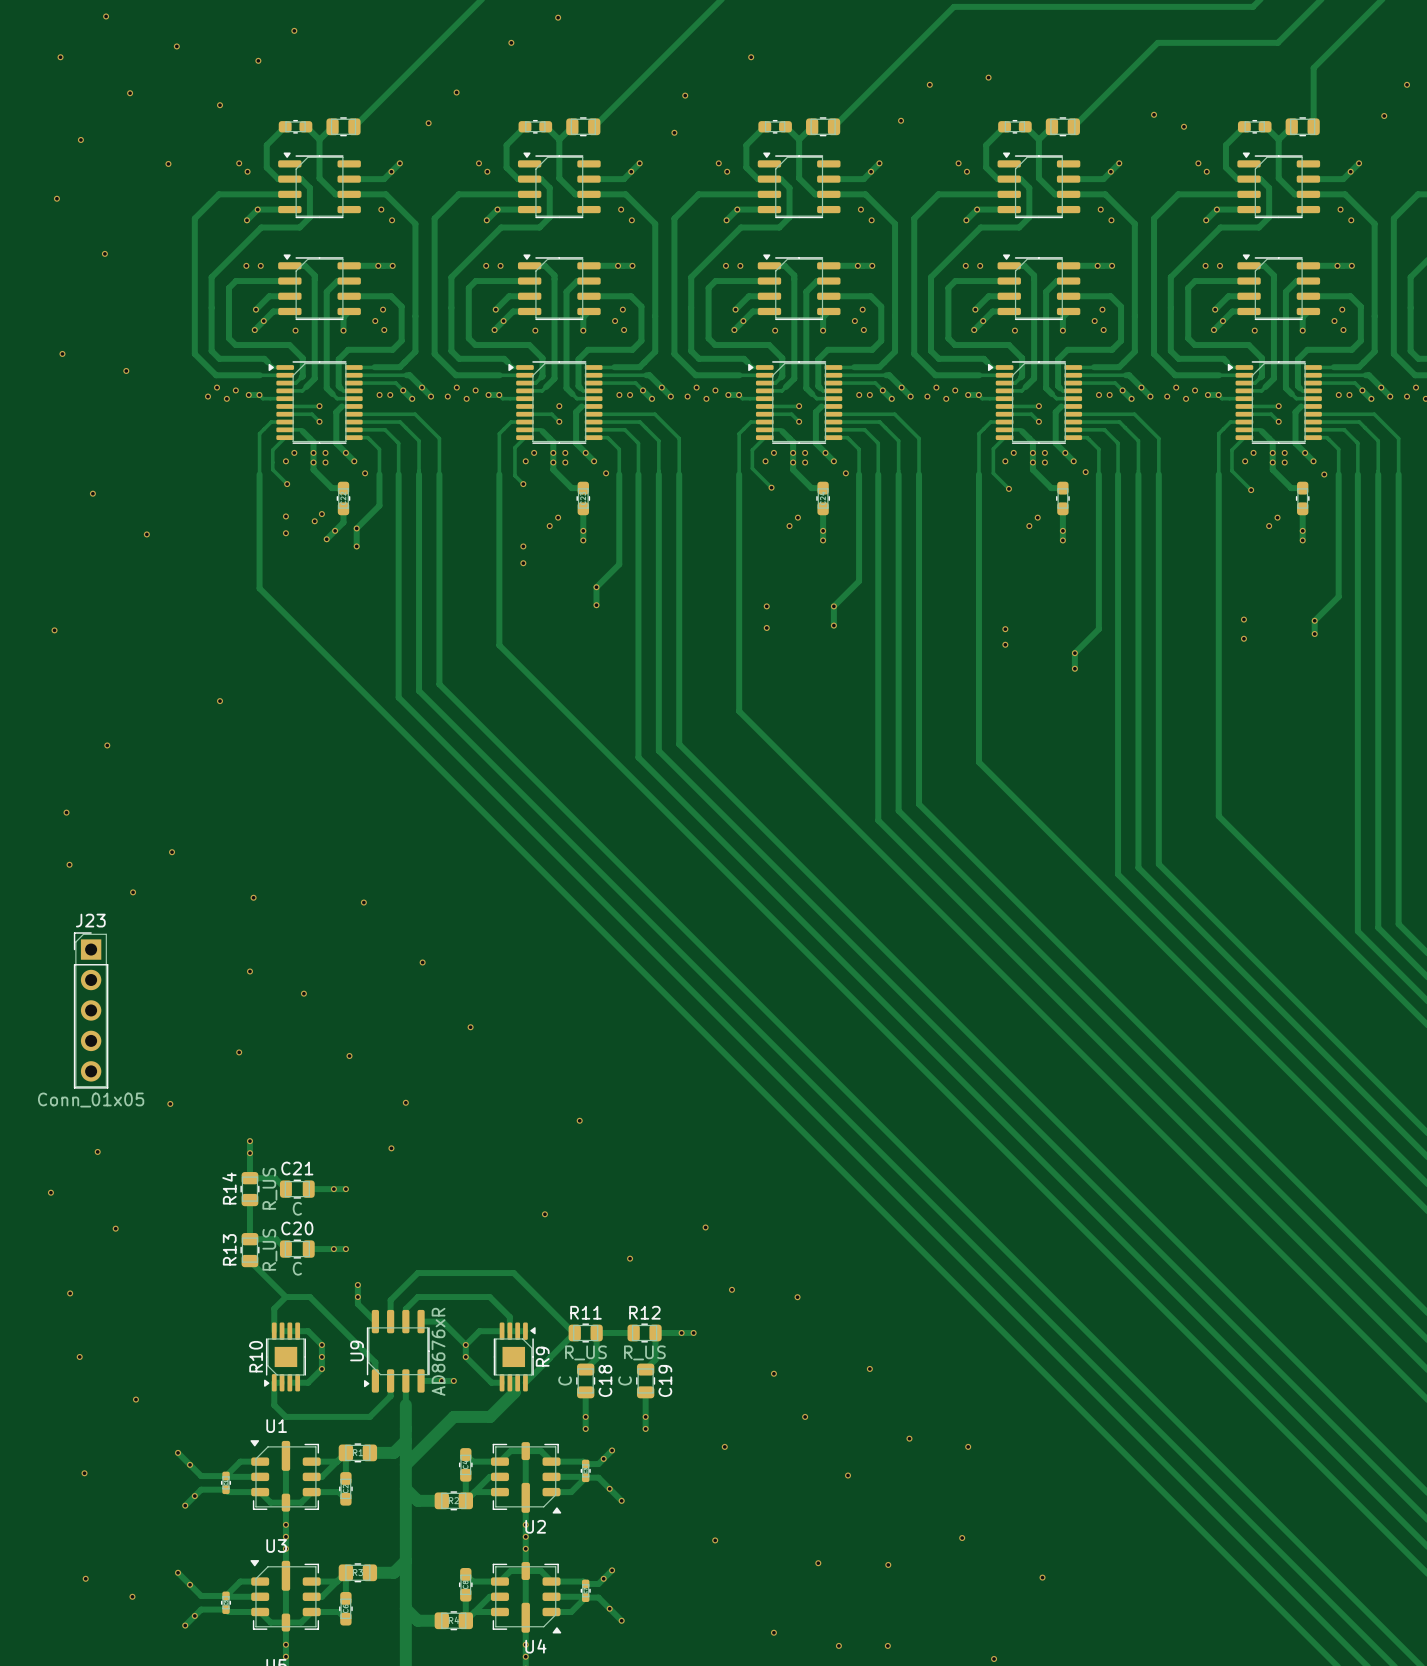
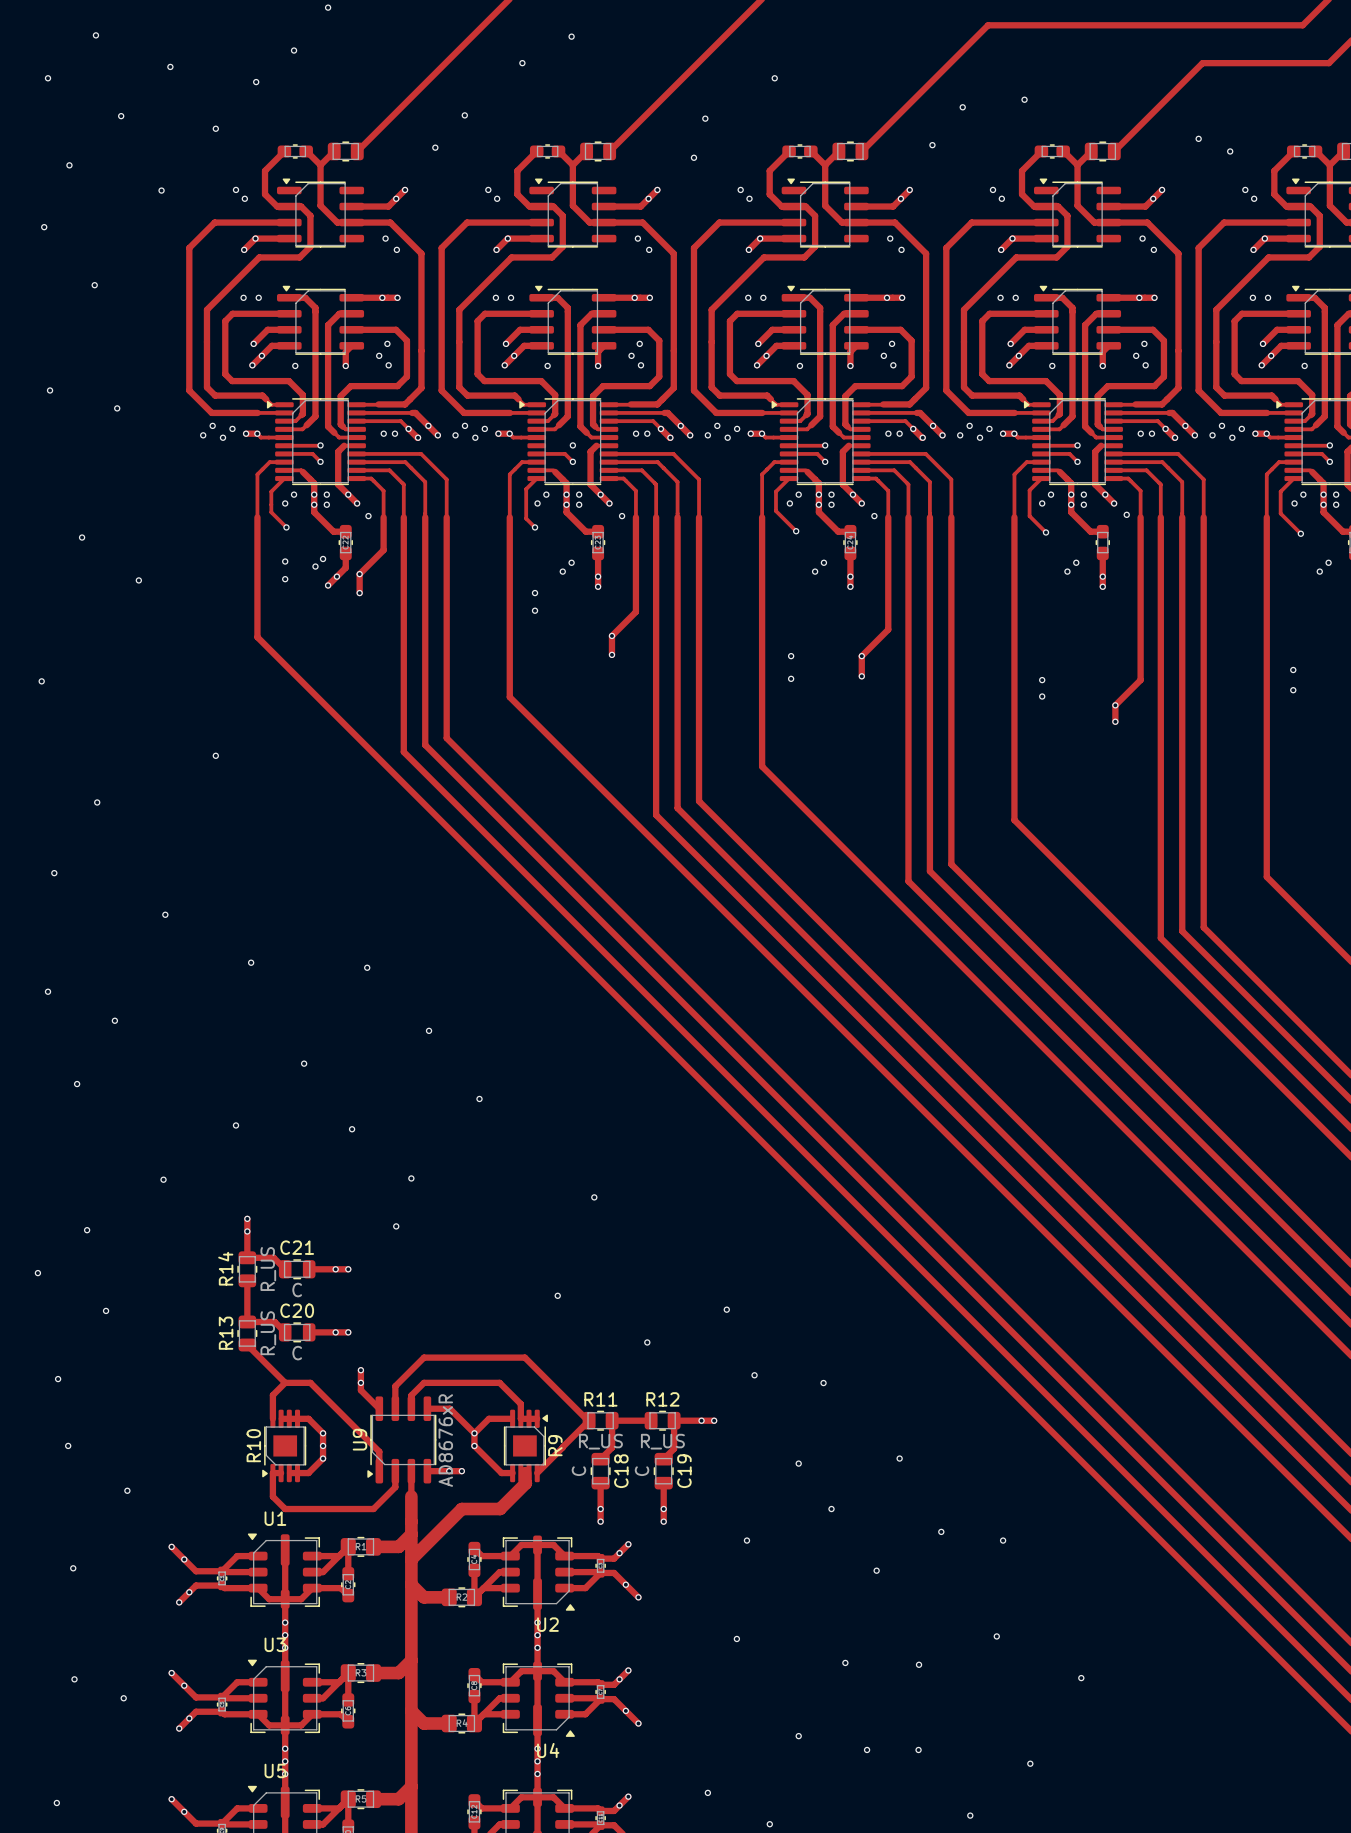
via: (69, 864) -> none
via: (133, 892) -> none
via: none -> (48, 991)
via: none -> (114, 1020)
via: (249, 971) -> none
J23: Conn_01x05 (91, 1010) -> none
via: none -> (77, 1084)

